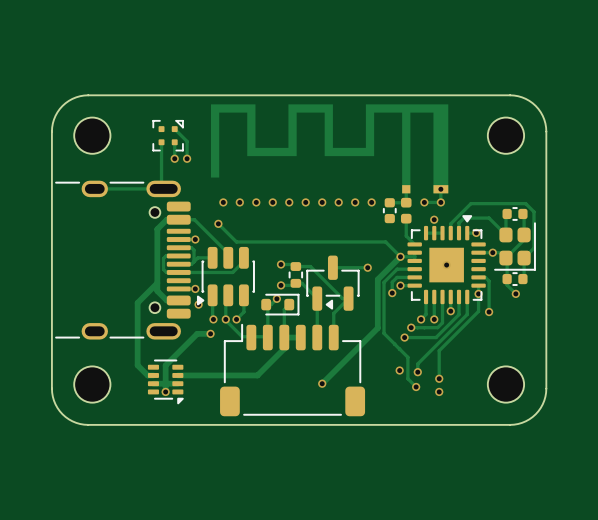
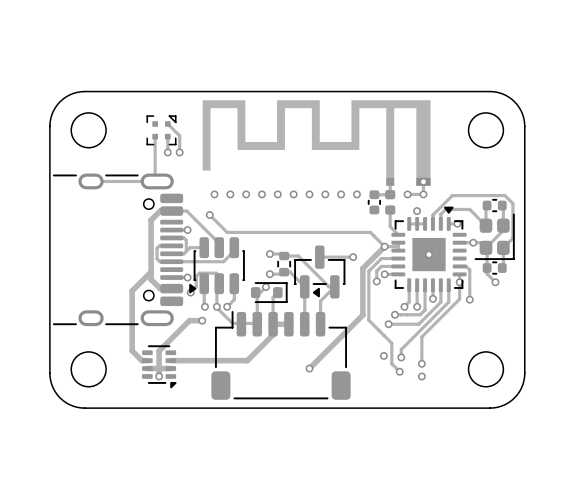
track: none -> (219, 286) (219, 276) (216, 273) (199, 273) (196, 276) (196, 287) (190, 292)

